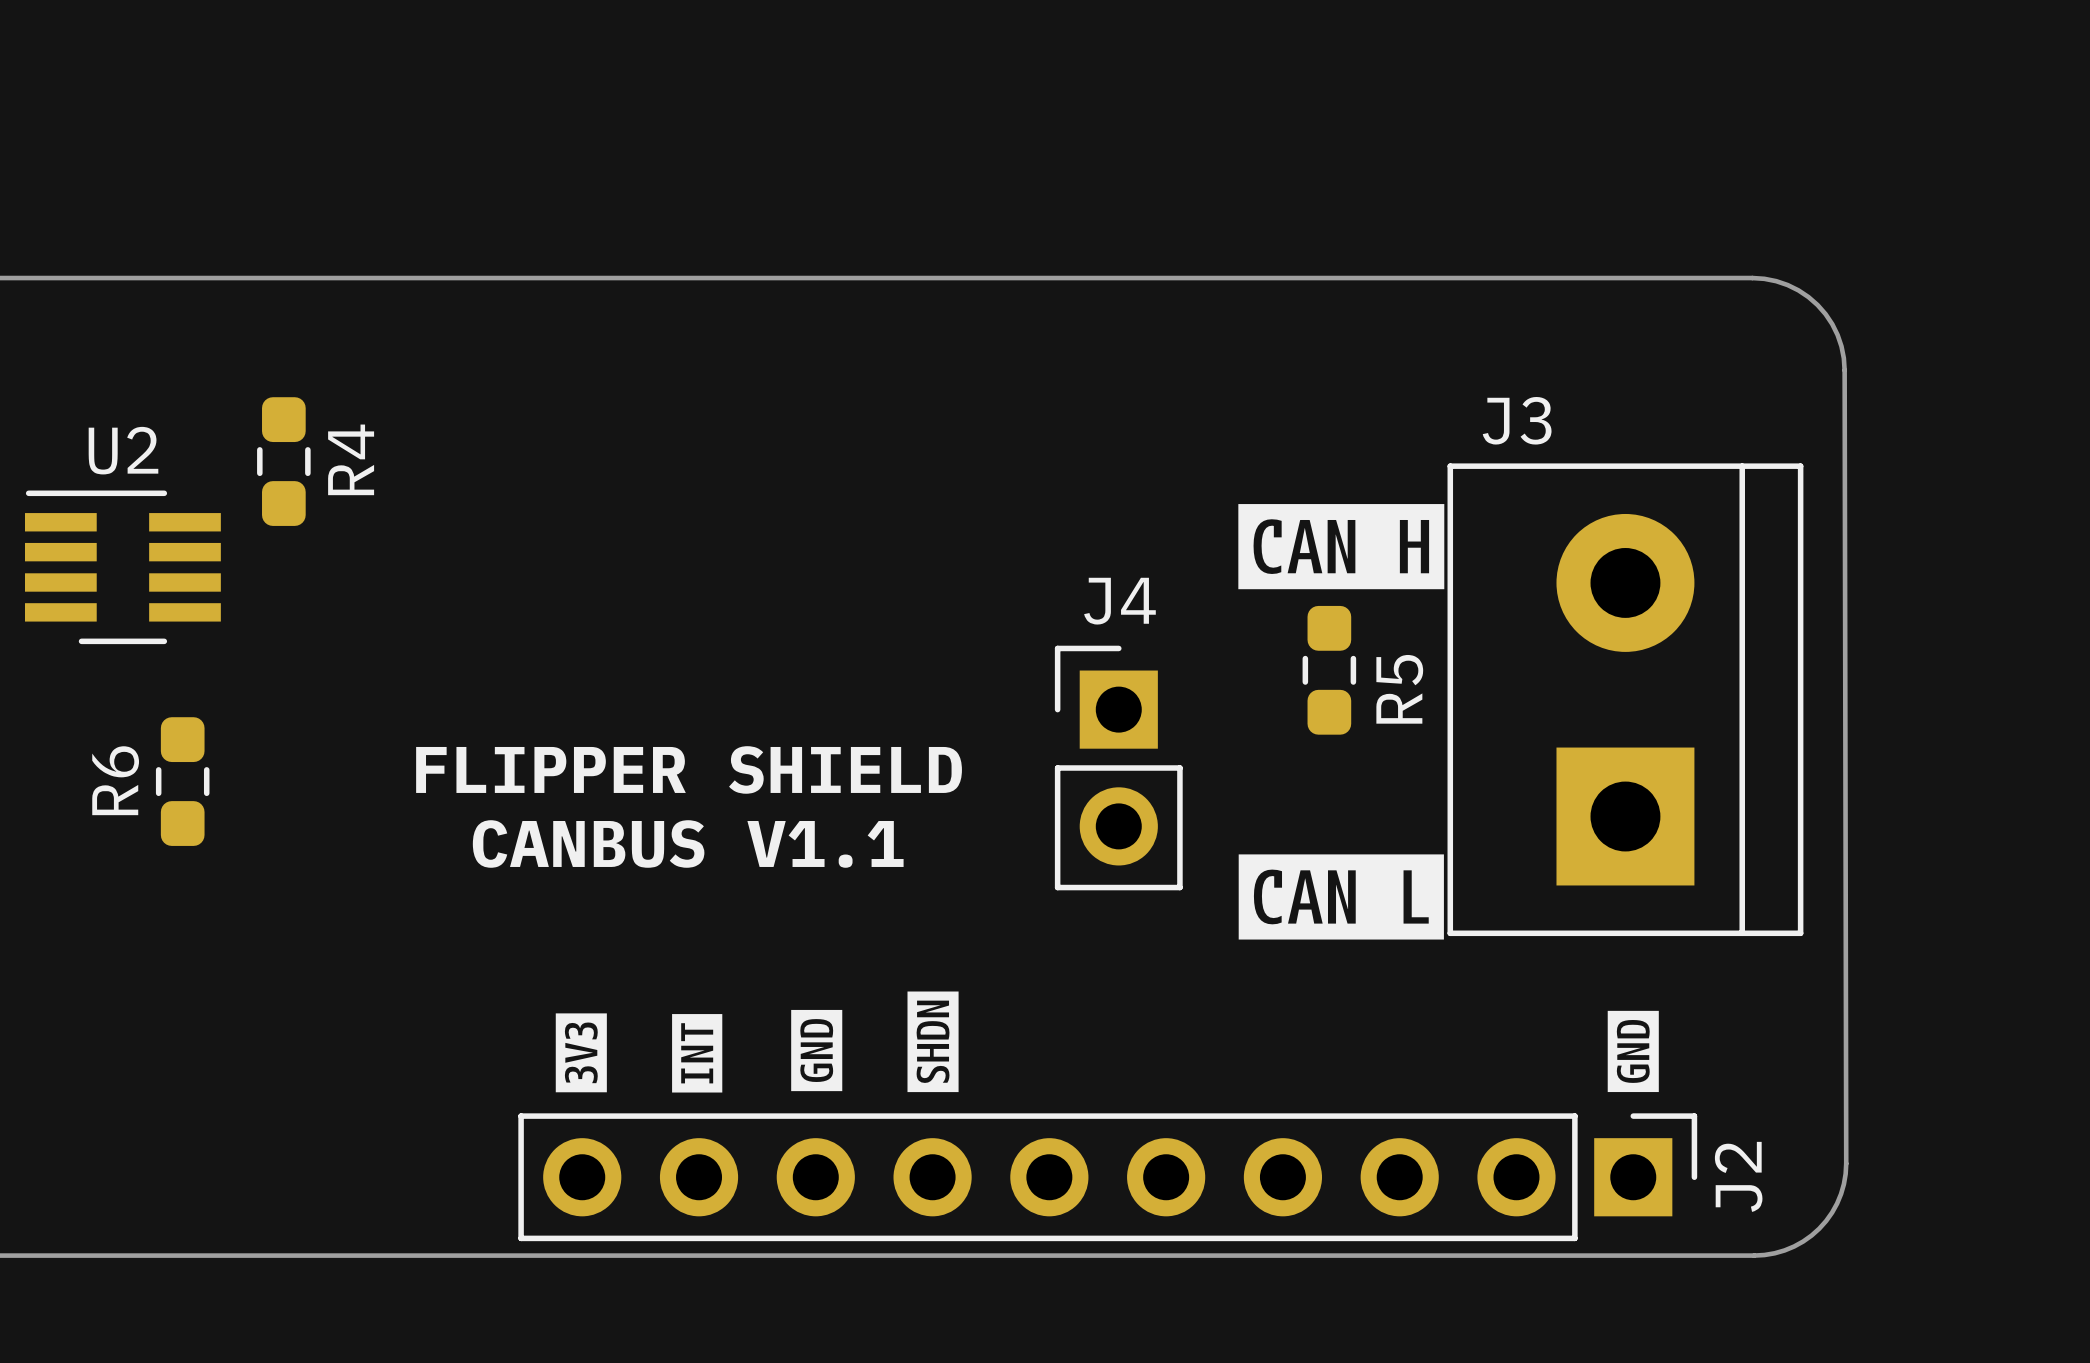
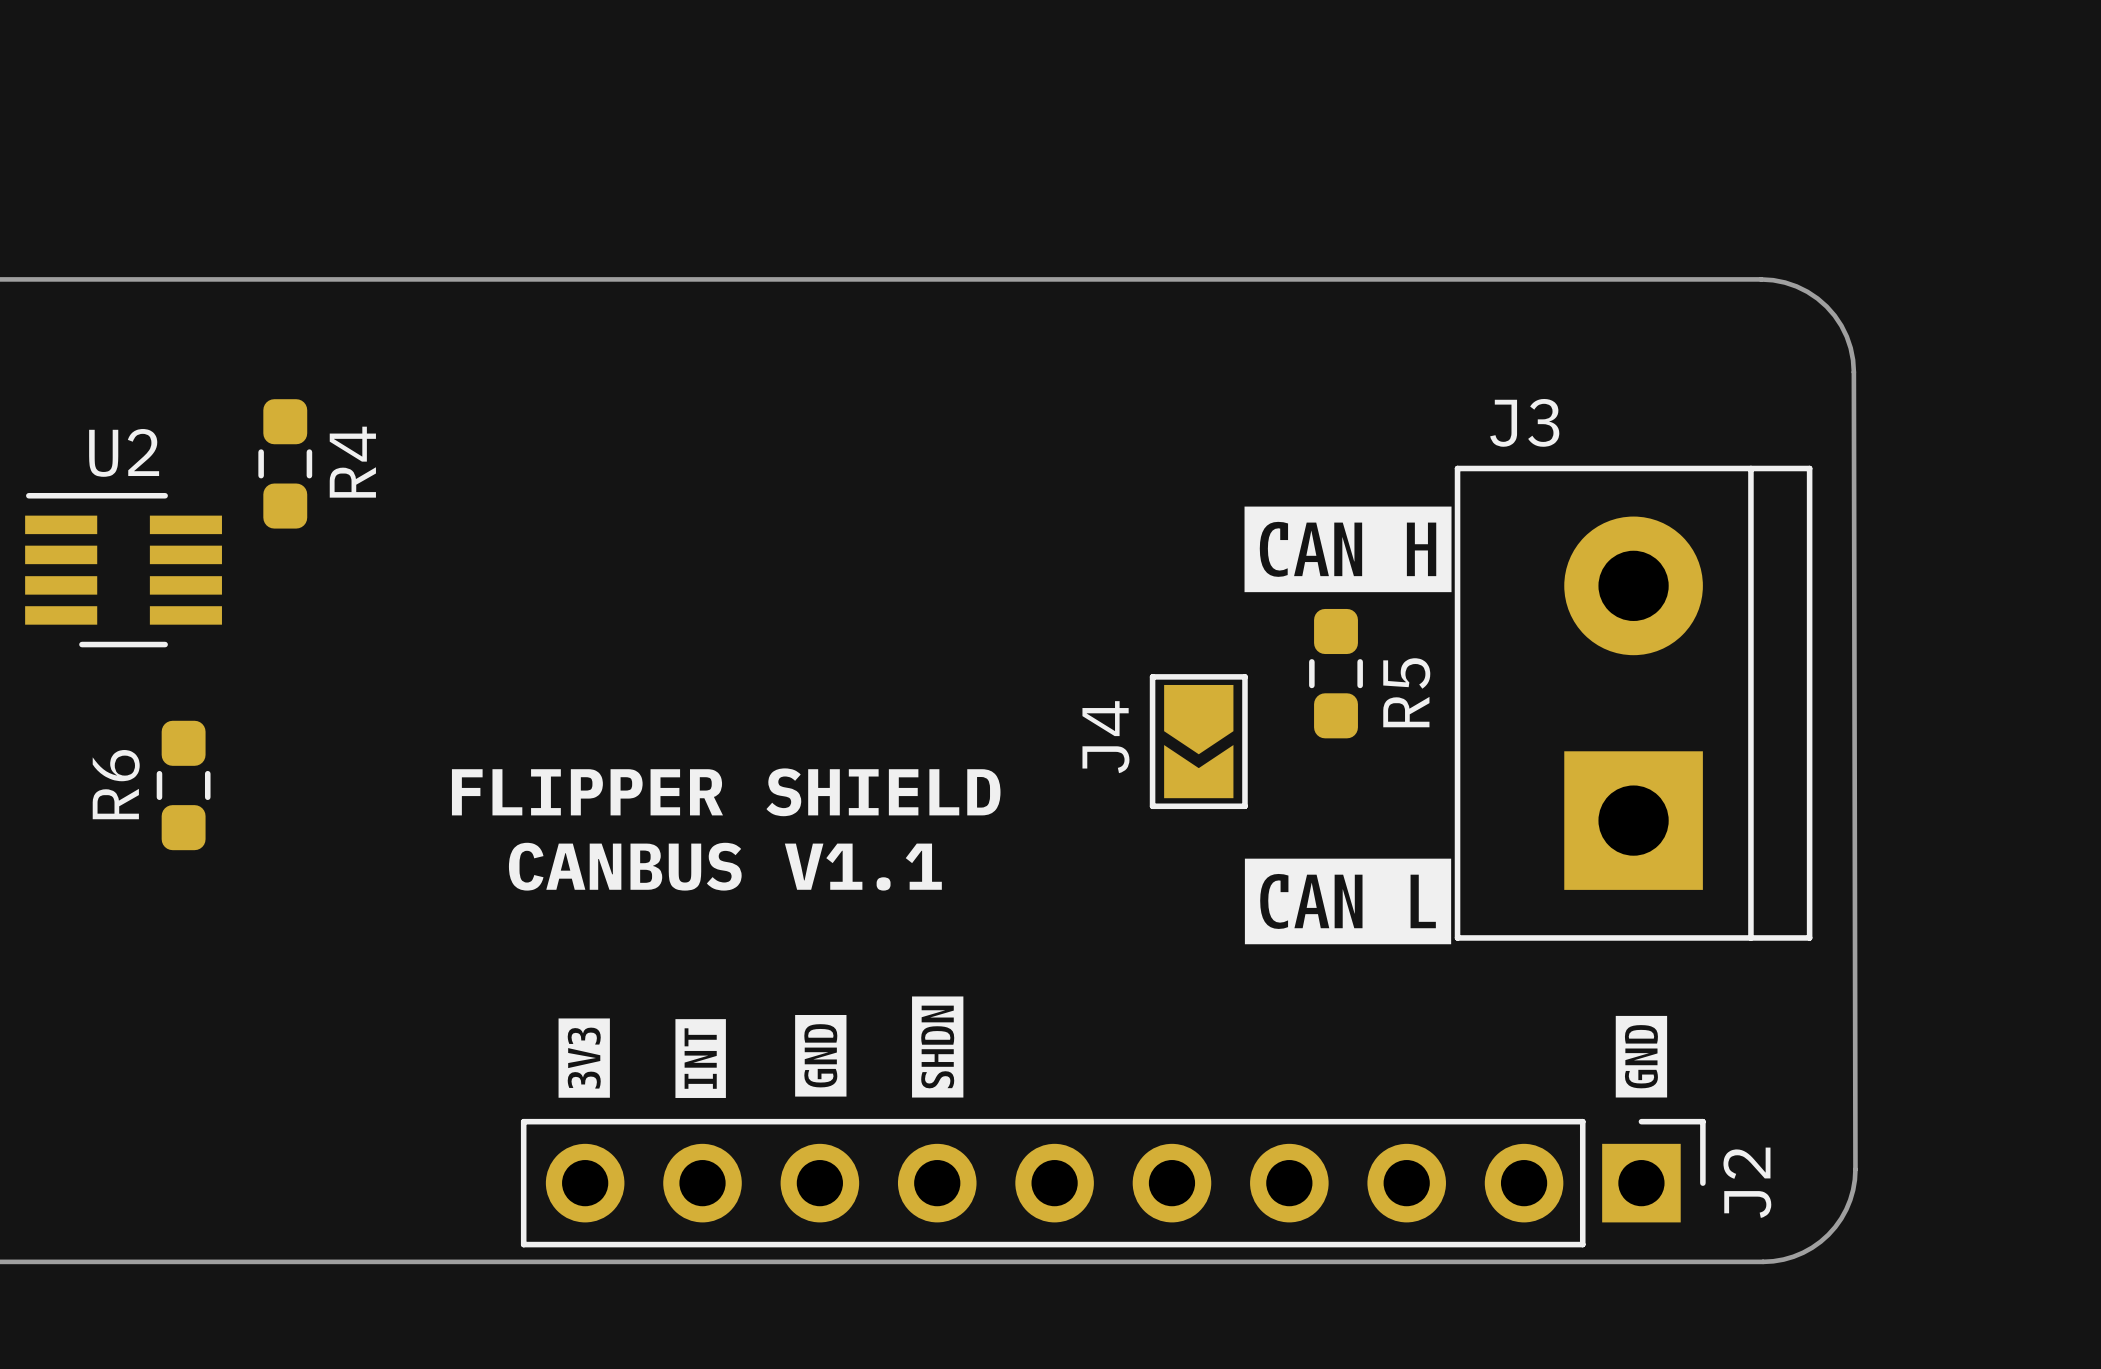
J4 name position: J4 (1119, 601) -> J4 (1105, 737)
J4 footprint: [1054, 645, 1183, 891] -> [1149, 674, 1248, 810]
text position: FLIPPER SHIELD (689, 769) -> FLIPPER SHIELD (726, 792)
text position: CANBUS V1.1 (688, 843) -> CANBUS V1.1 (725, 866)

